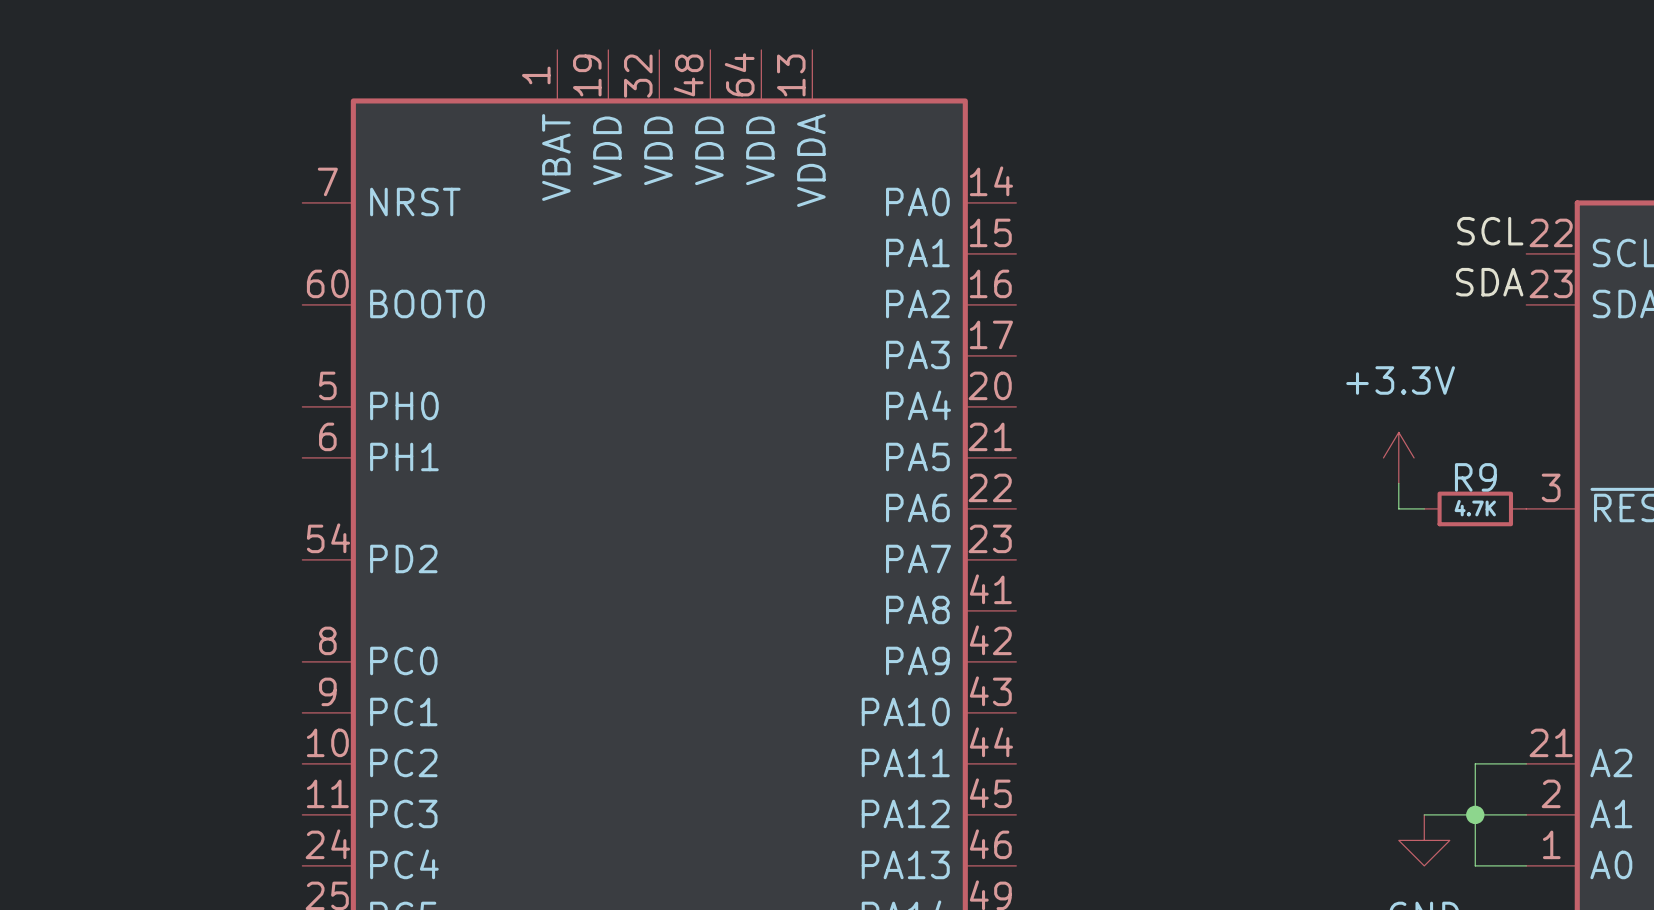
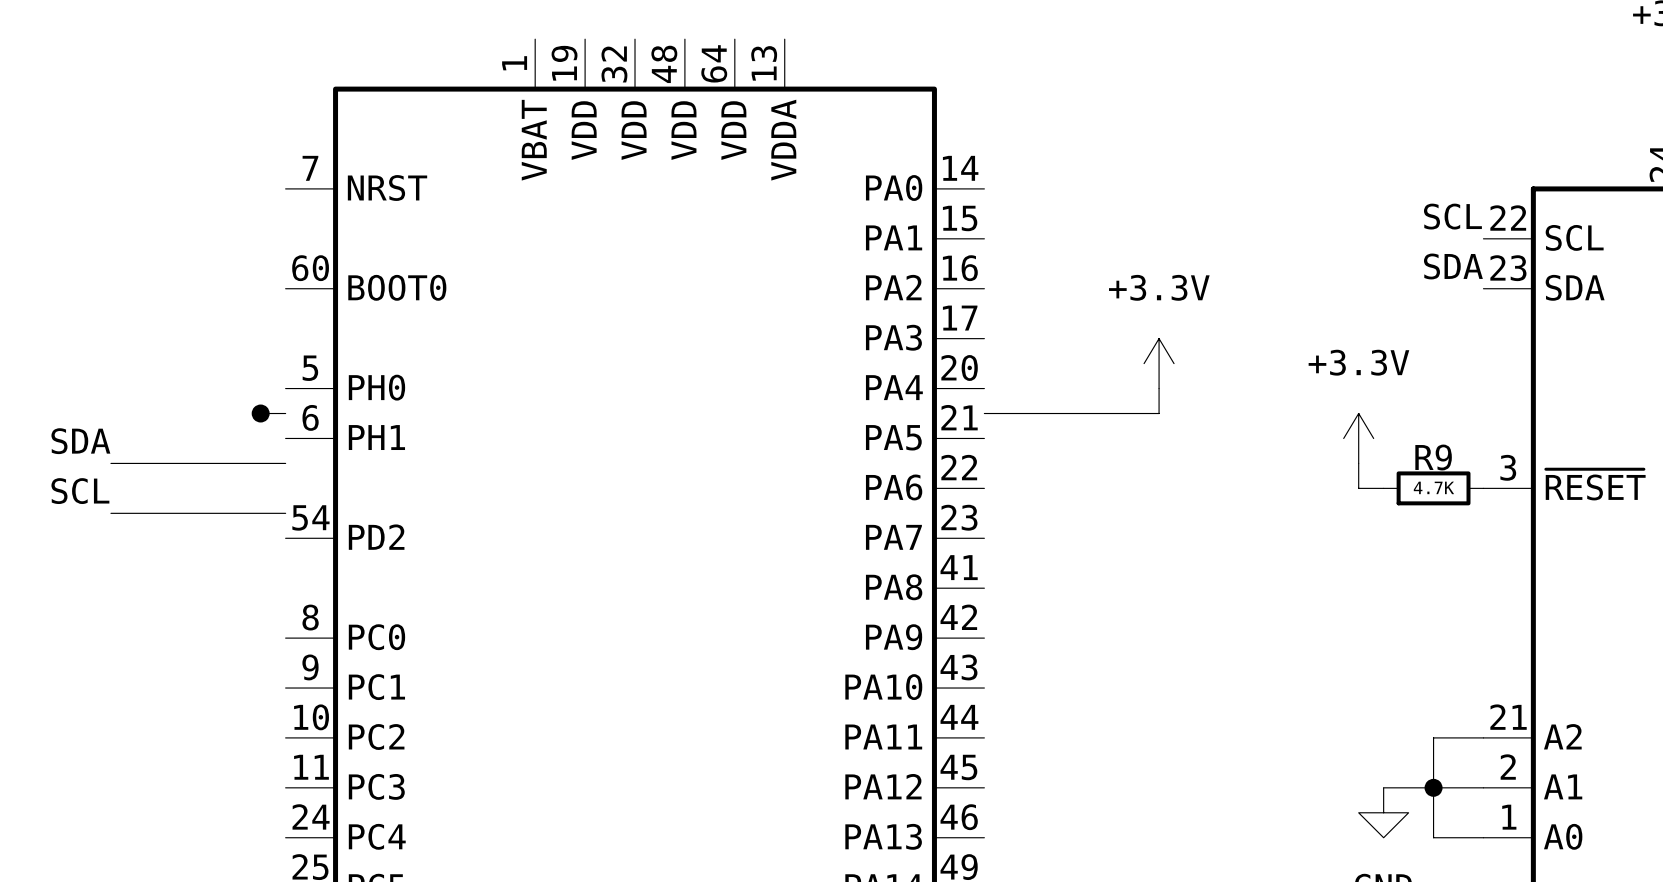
power symbol: none -> +3.3V (1159, 363)
wire: none -> (1159, 388) (1159, 413) (984, 413)
wire: none -> (260, 413) (285, 413)
junction: none -> (260, 413)
label: none -> SDA (80, 441)
wire: none -> (110, 463) (285, 463)
label: none -> SCL (80, 491)
wire: none -> (110, 513) (285, 513)

